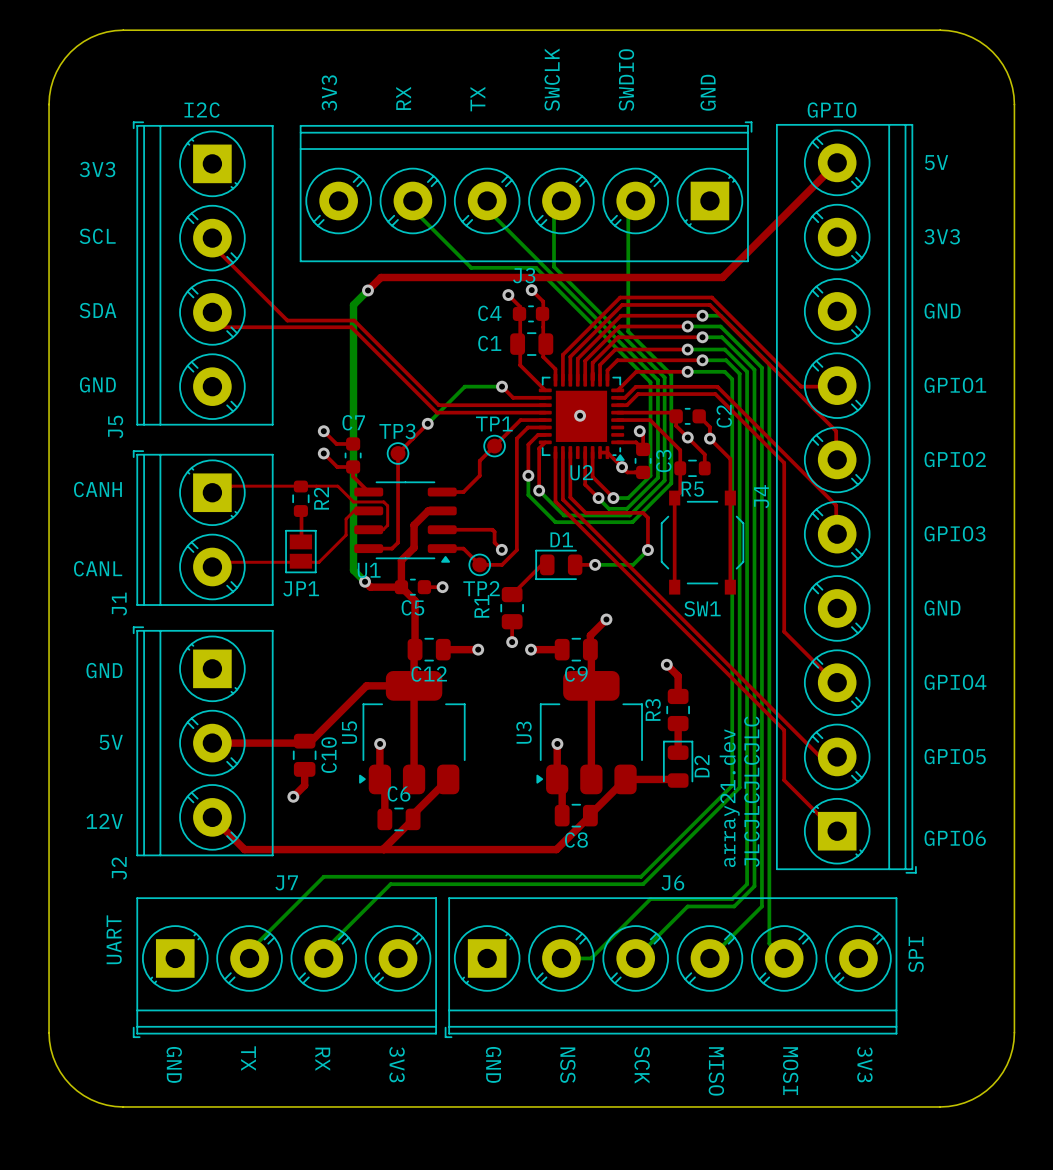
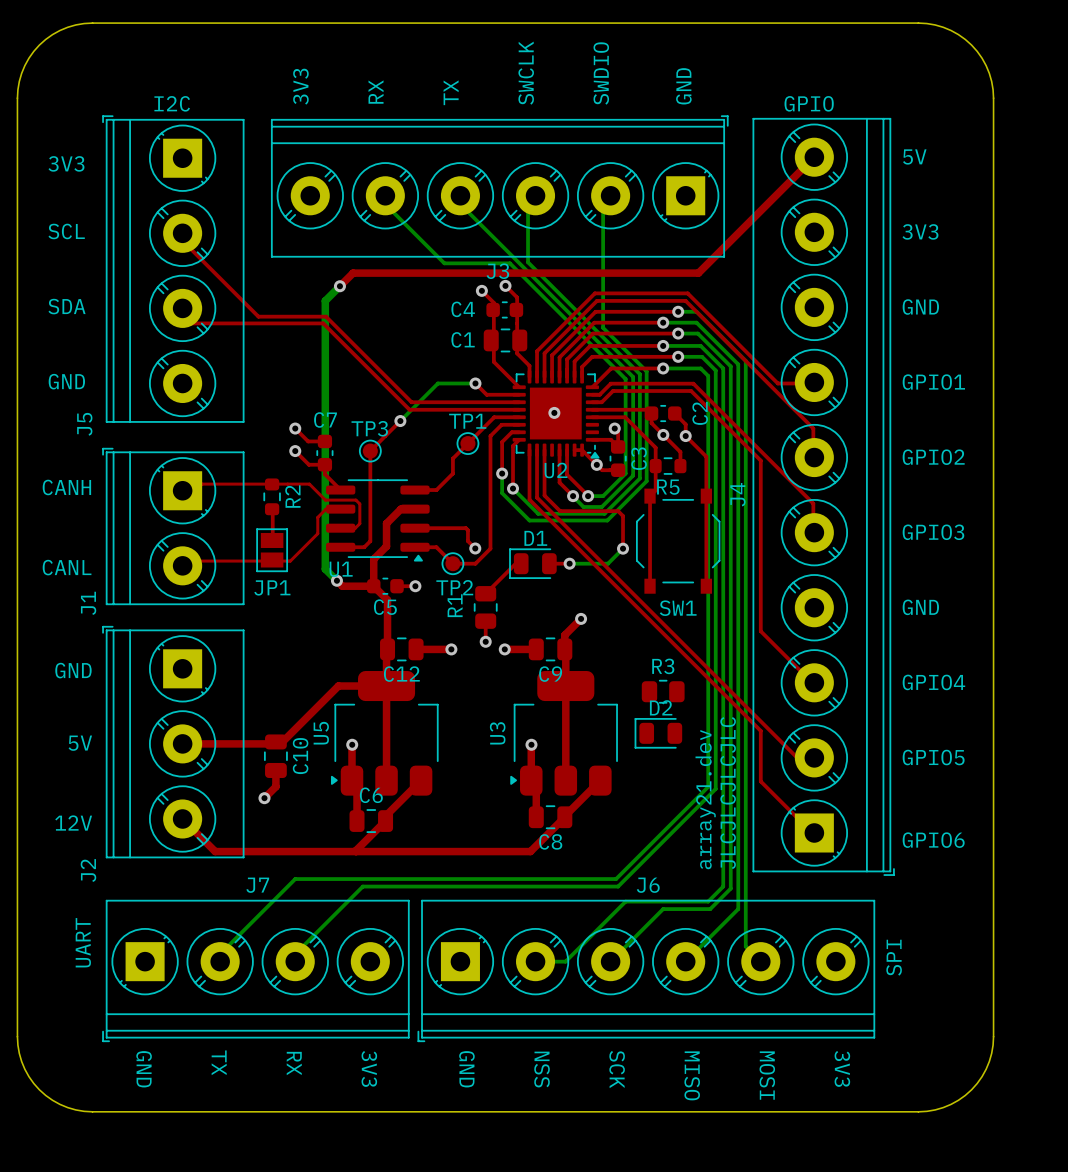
top track: (666, 664) (678, 676) (678, 696) -> none
via: (666, 664) -> none
R3 rotation: 0° (678, 710) -> 90° clockwise (663, 691)
top track: (678, 723) (678, 752) -> none
D2 rotation: 0° (678, 764) -> 90° counterclockwise (658, 733)
D2 position: (678, 764) -> (658, 733)
top track: (625, 779) (678, 780) -> none

